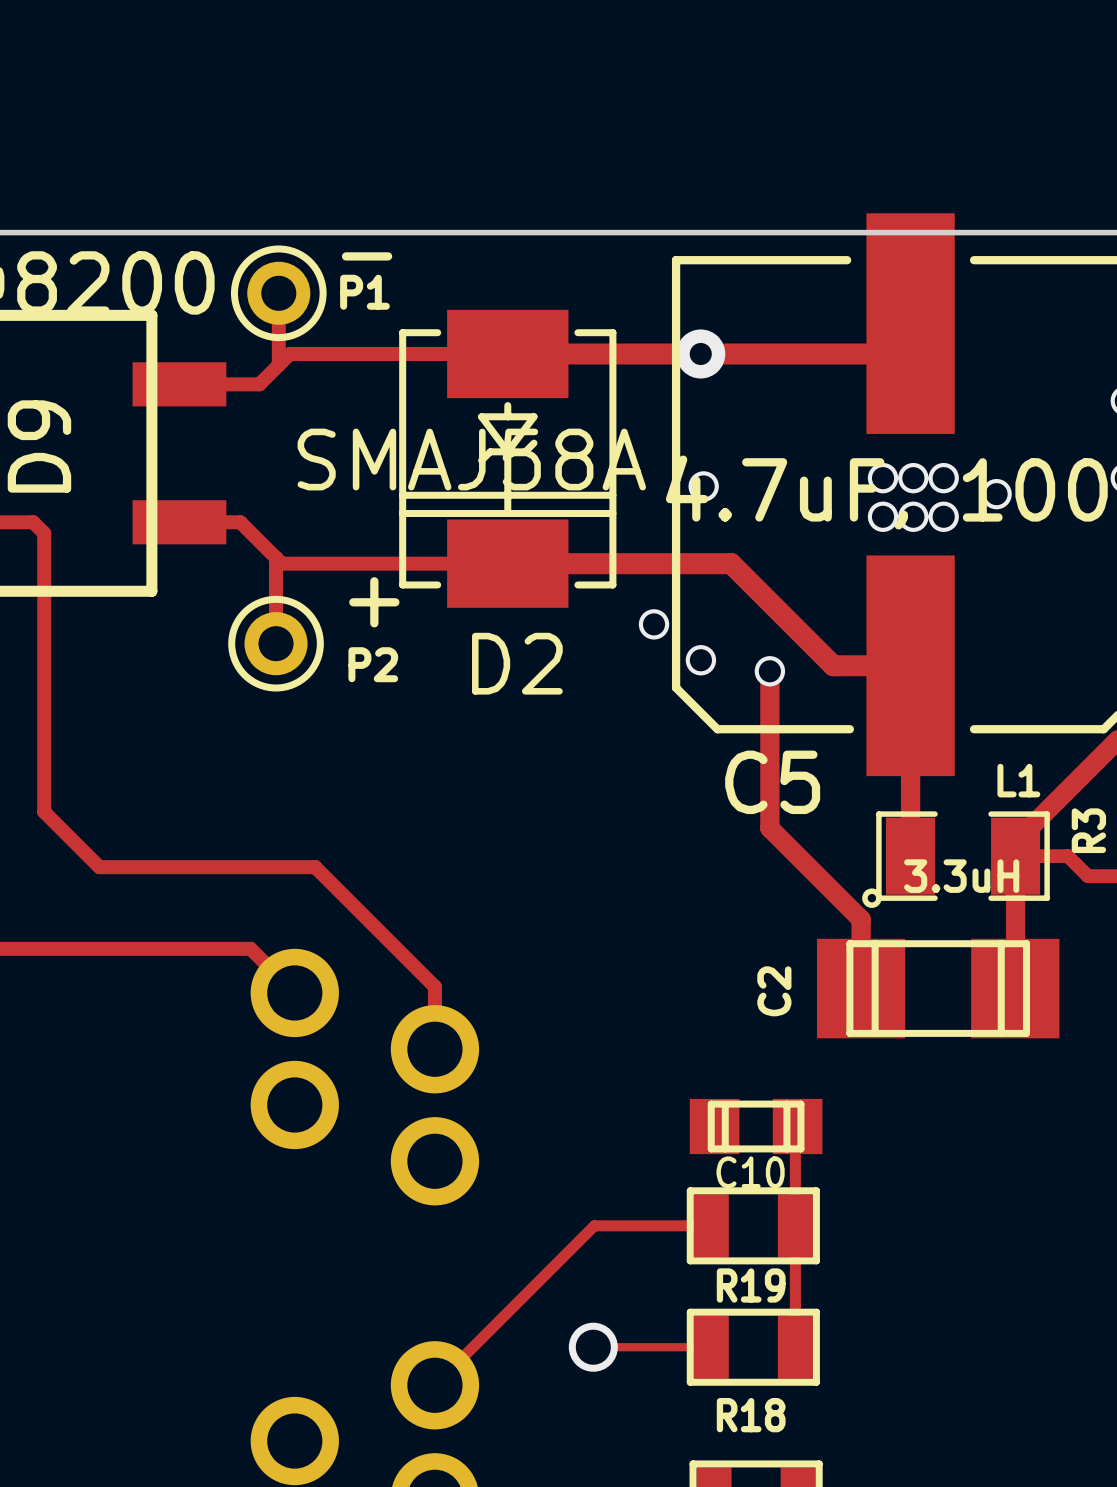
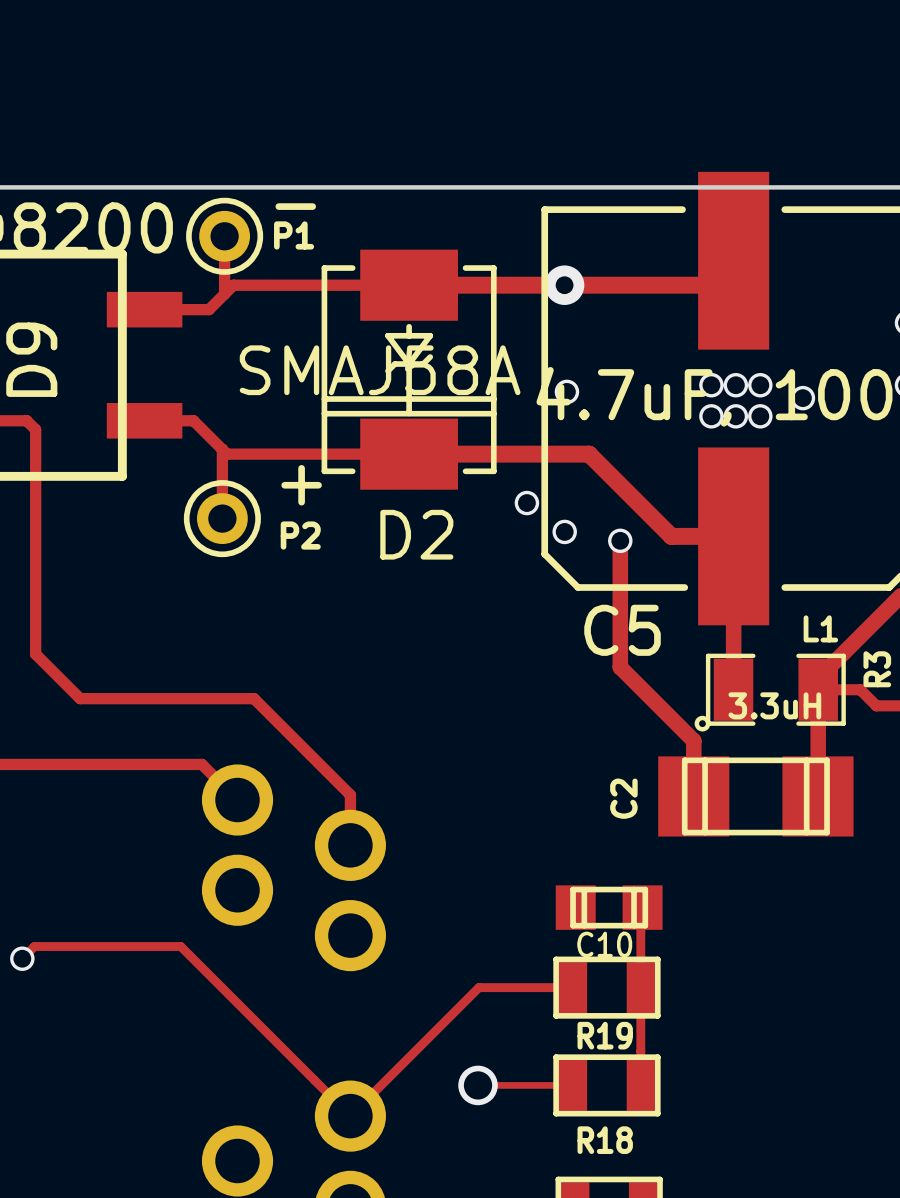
track: none -> (22, 958) (34, 946) (180, 946) (350, 1116)
via: none -> (22, 958)

